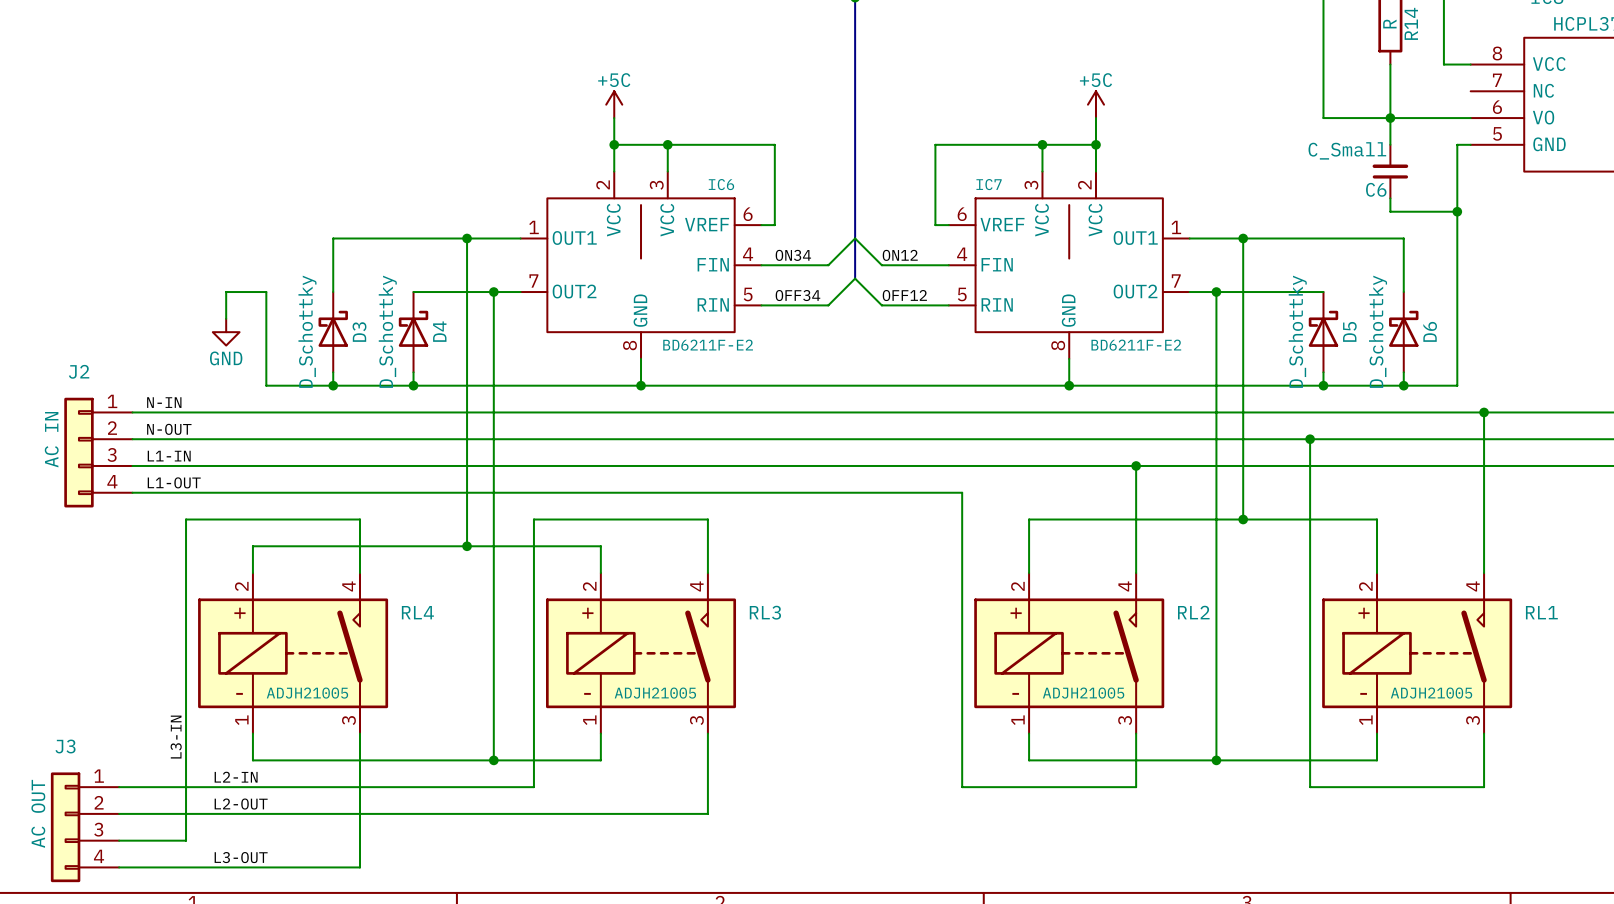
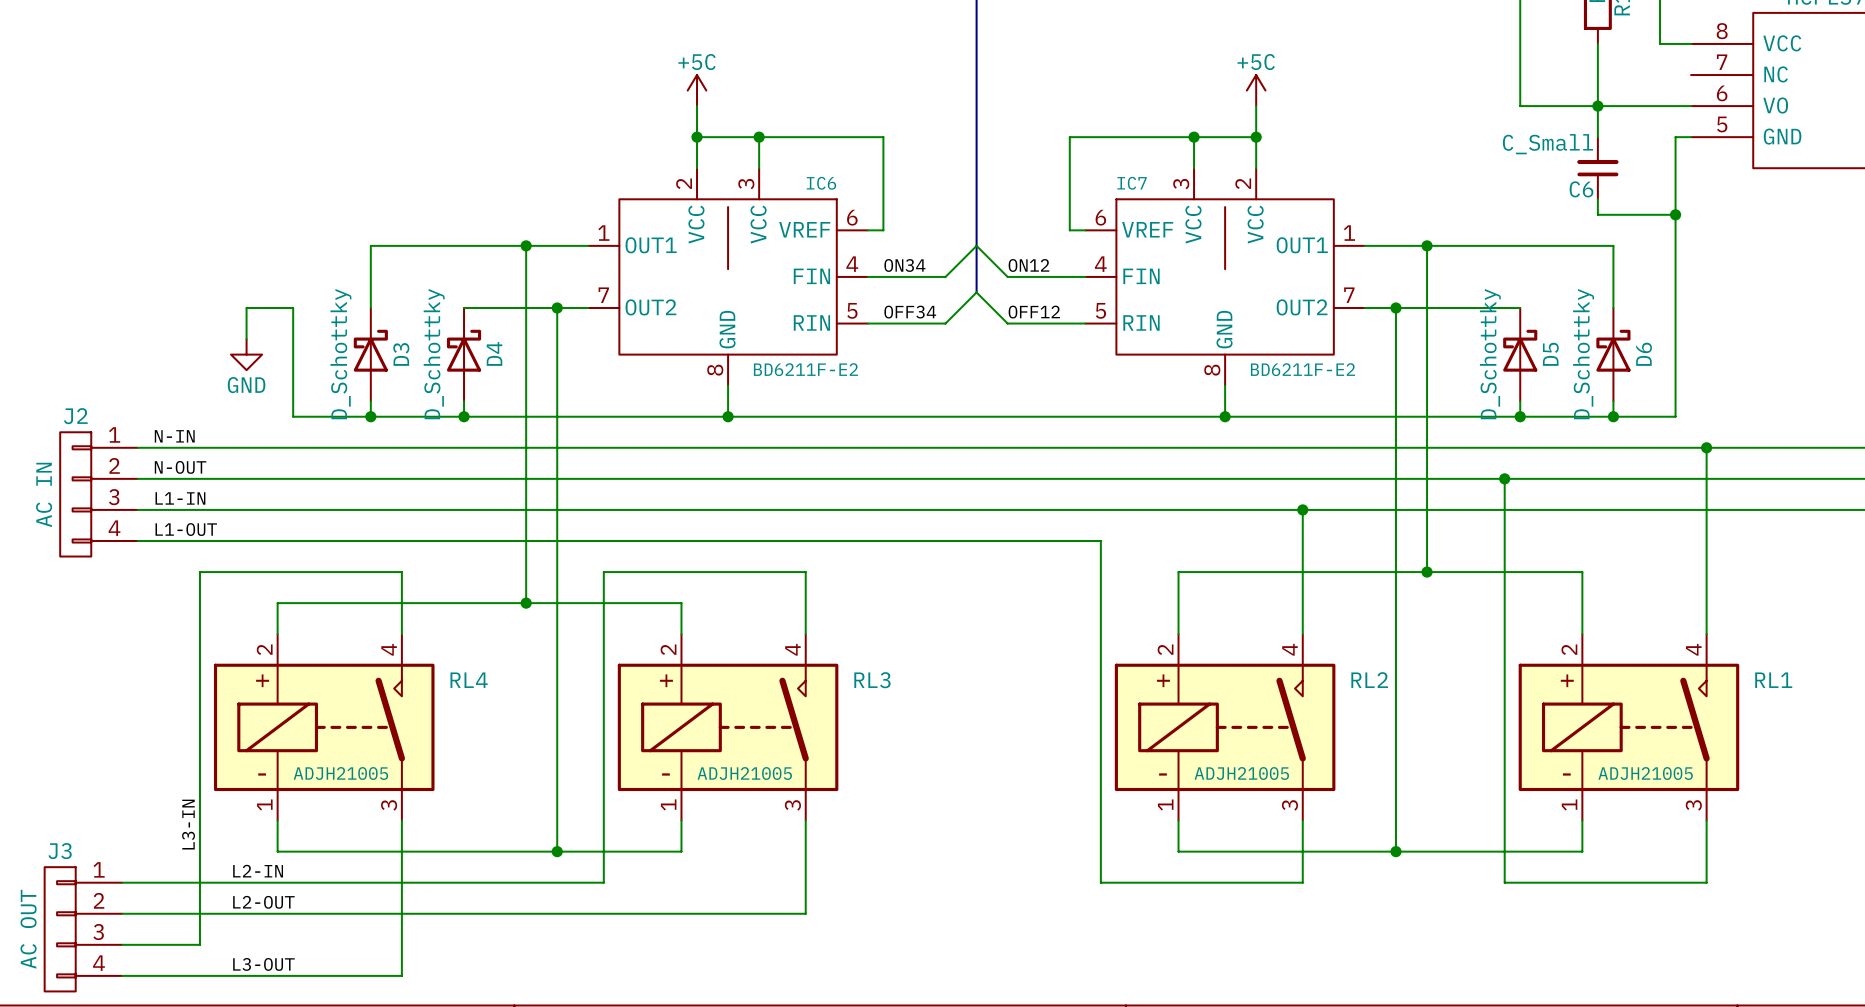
J2 symbol: [64, 397, 133, 508] -> [60, 432, 138, 557]
J3 symbol: [50, 772, 120, 883] -> [44, 867, 123, 992]

